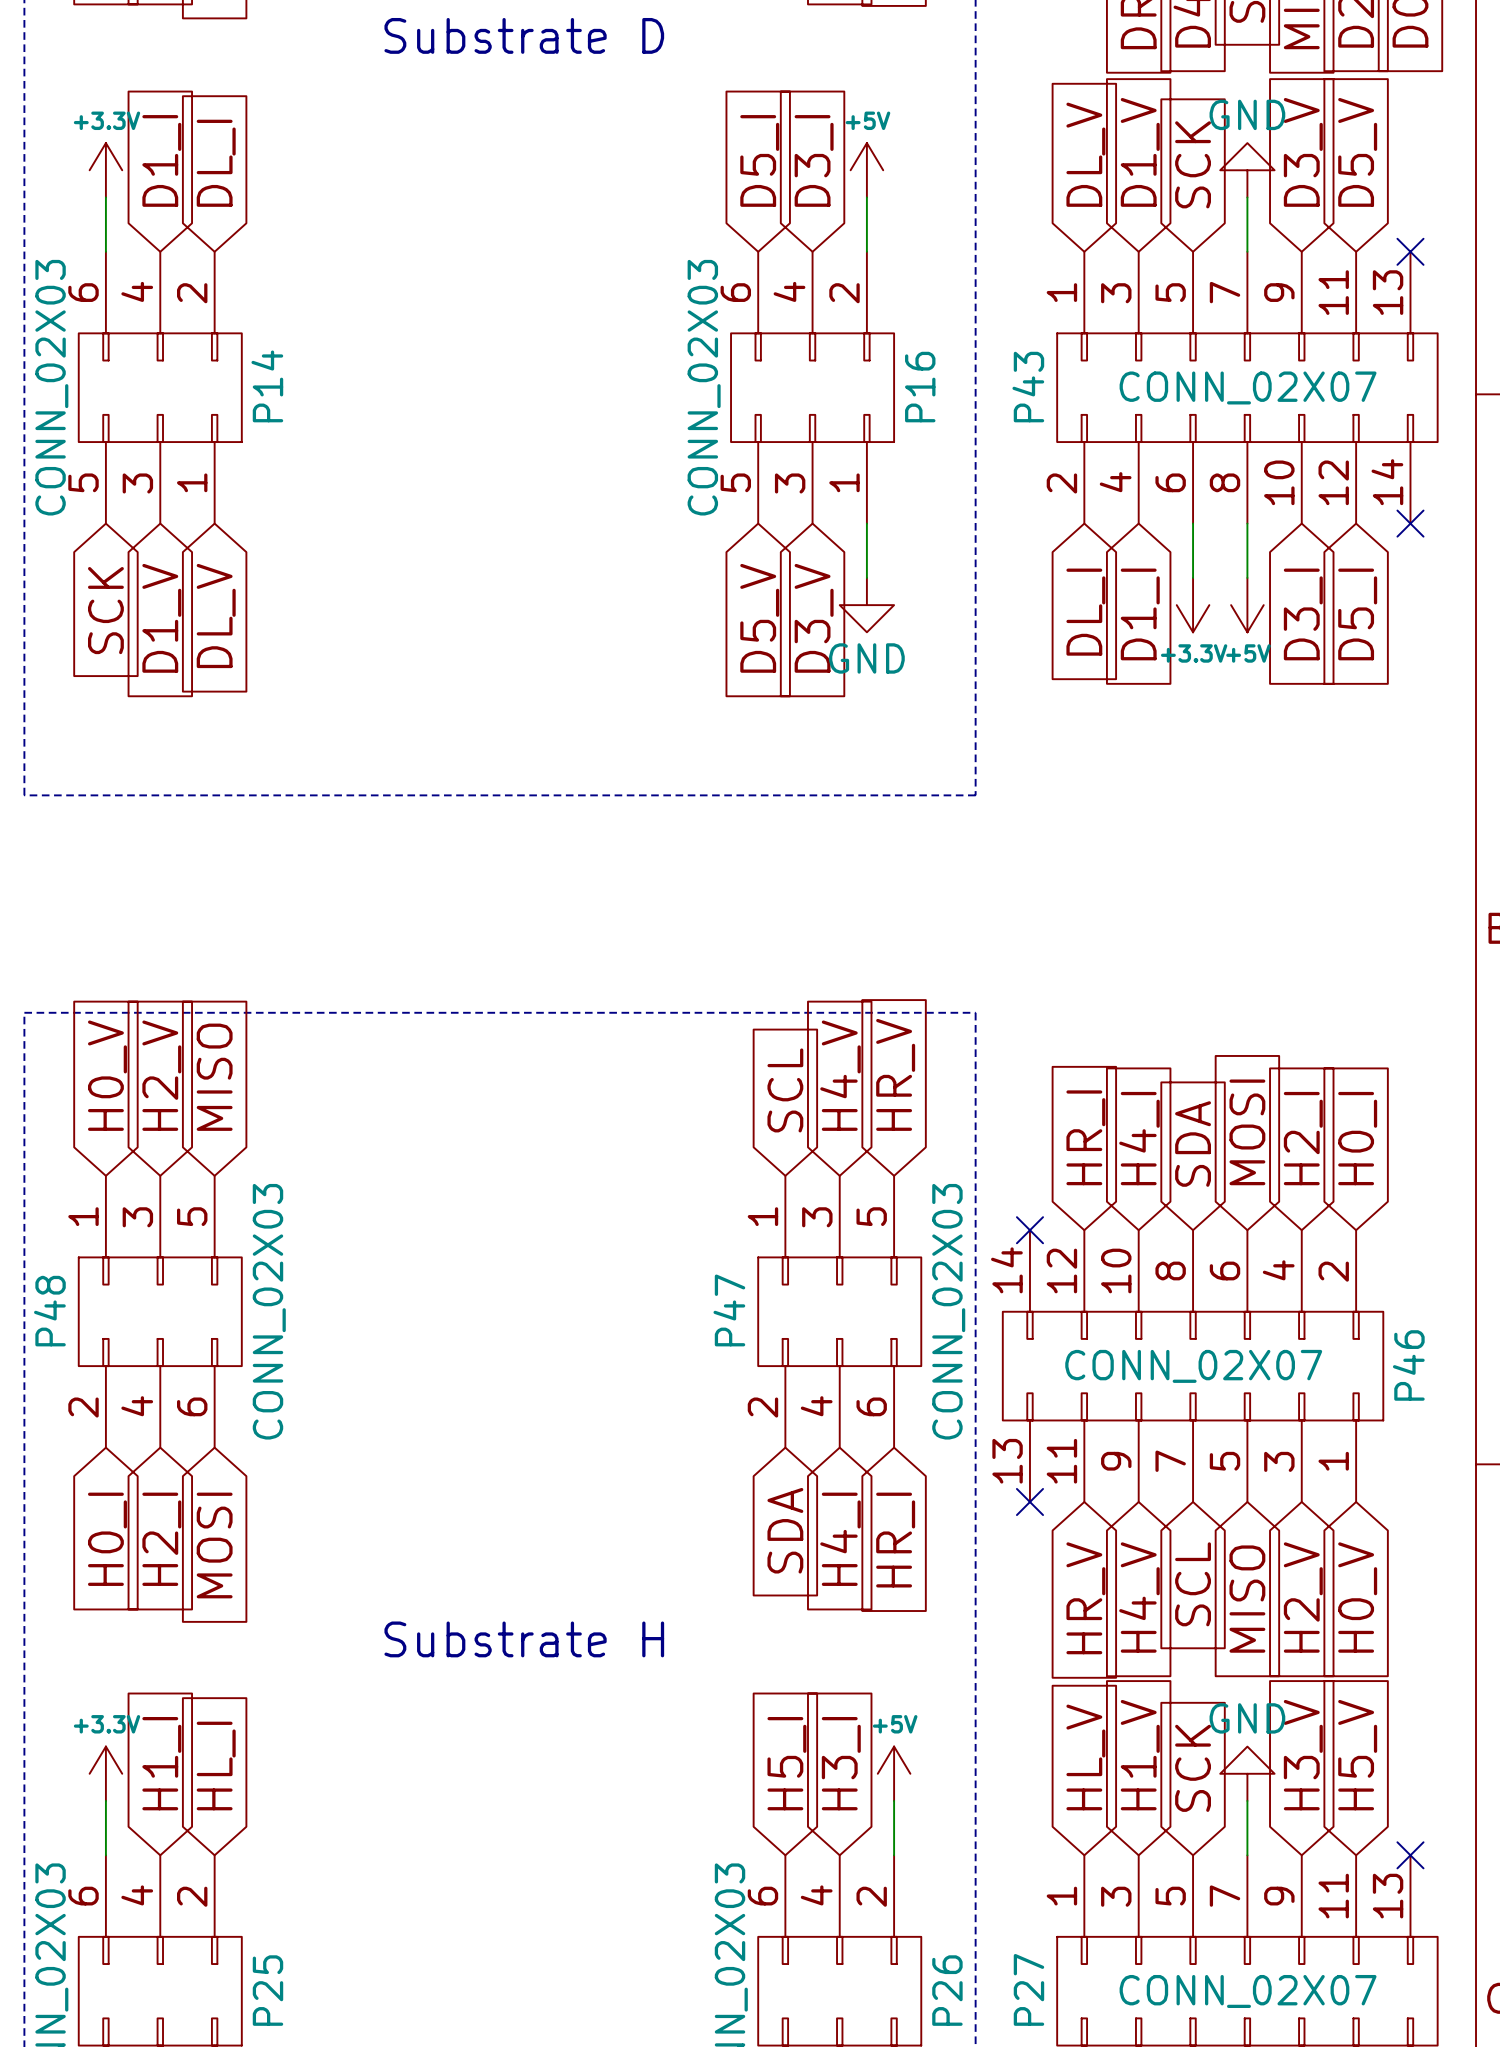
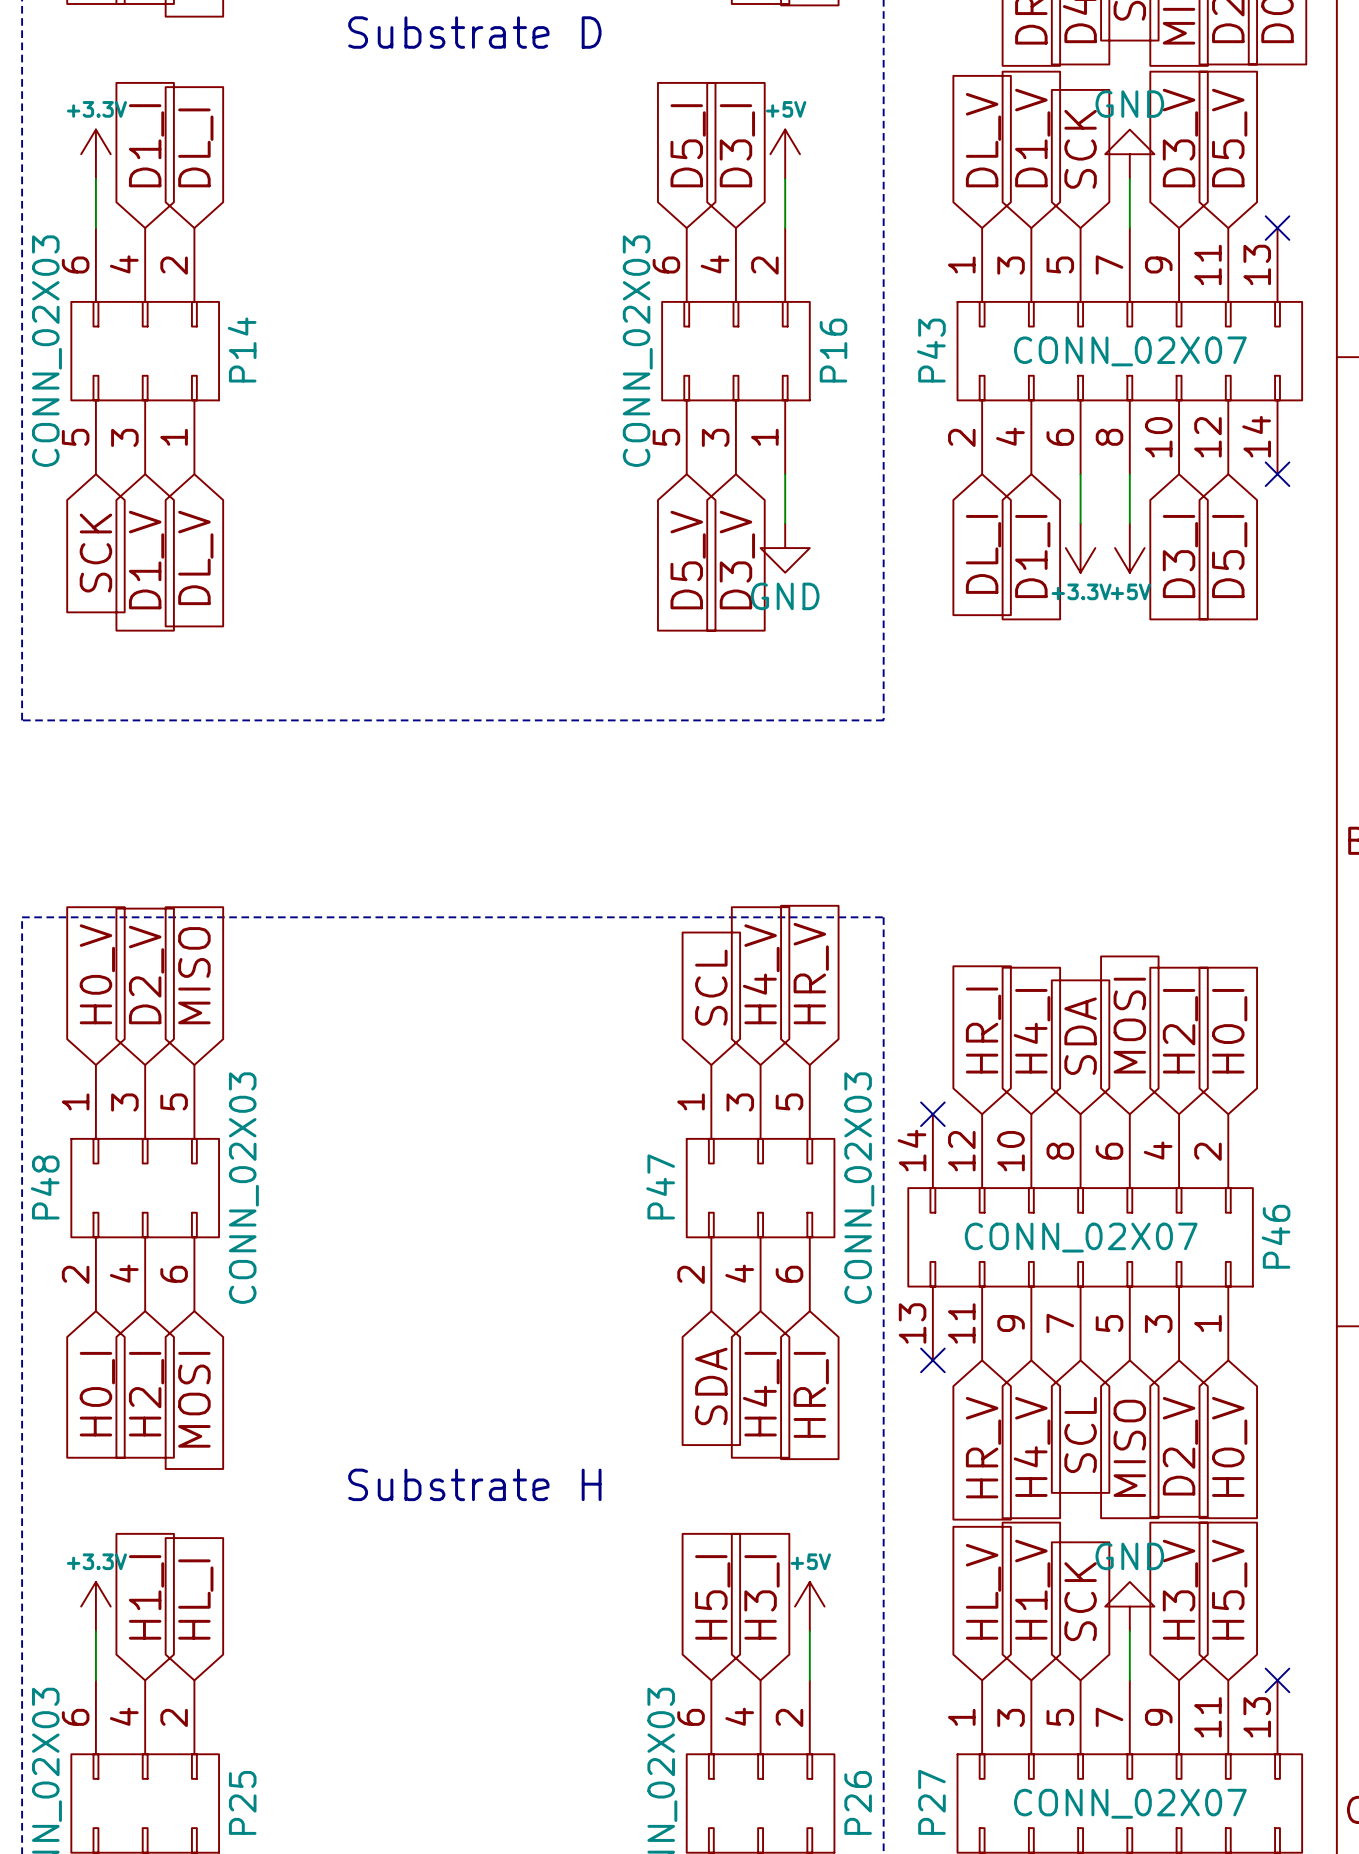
global label: H2_V (161, 1075) -> D2_V (146, 974)
global label: H2_V (1303, 1597) -> D2_V (1180, 1446)

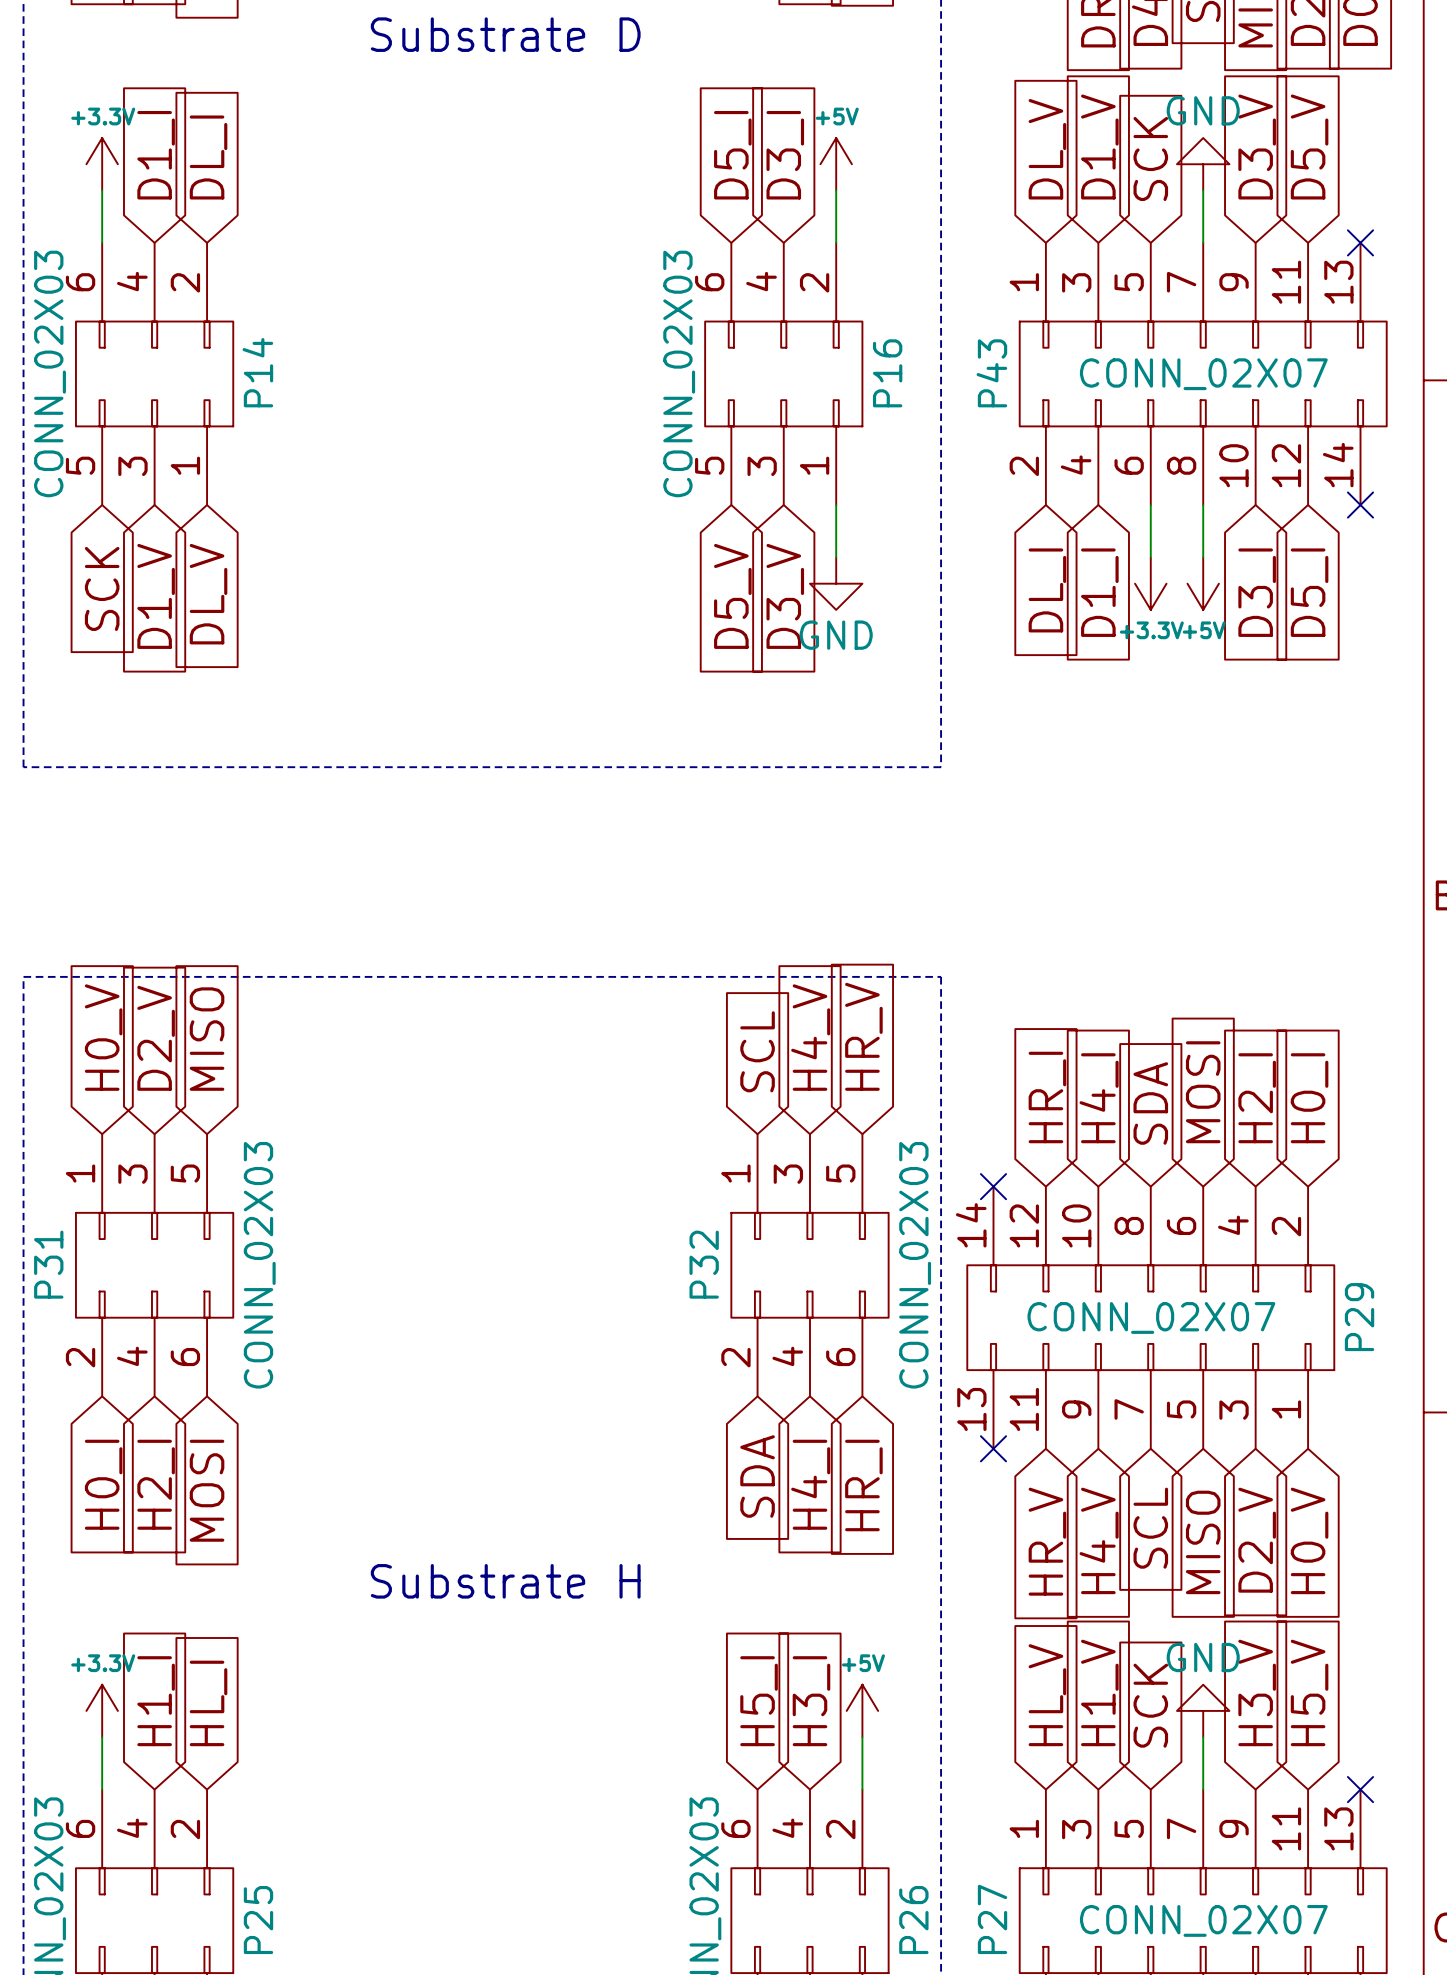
P47 name: P47 (660, 1186) -> P32 (704, 1264)
P48 name: P48 (45, 1187) -> P31 (48, 1264)
P46 name: P46 (1276, 1236) -> P29 (1359, 1317)

